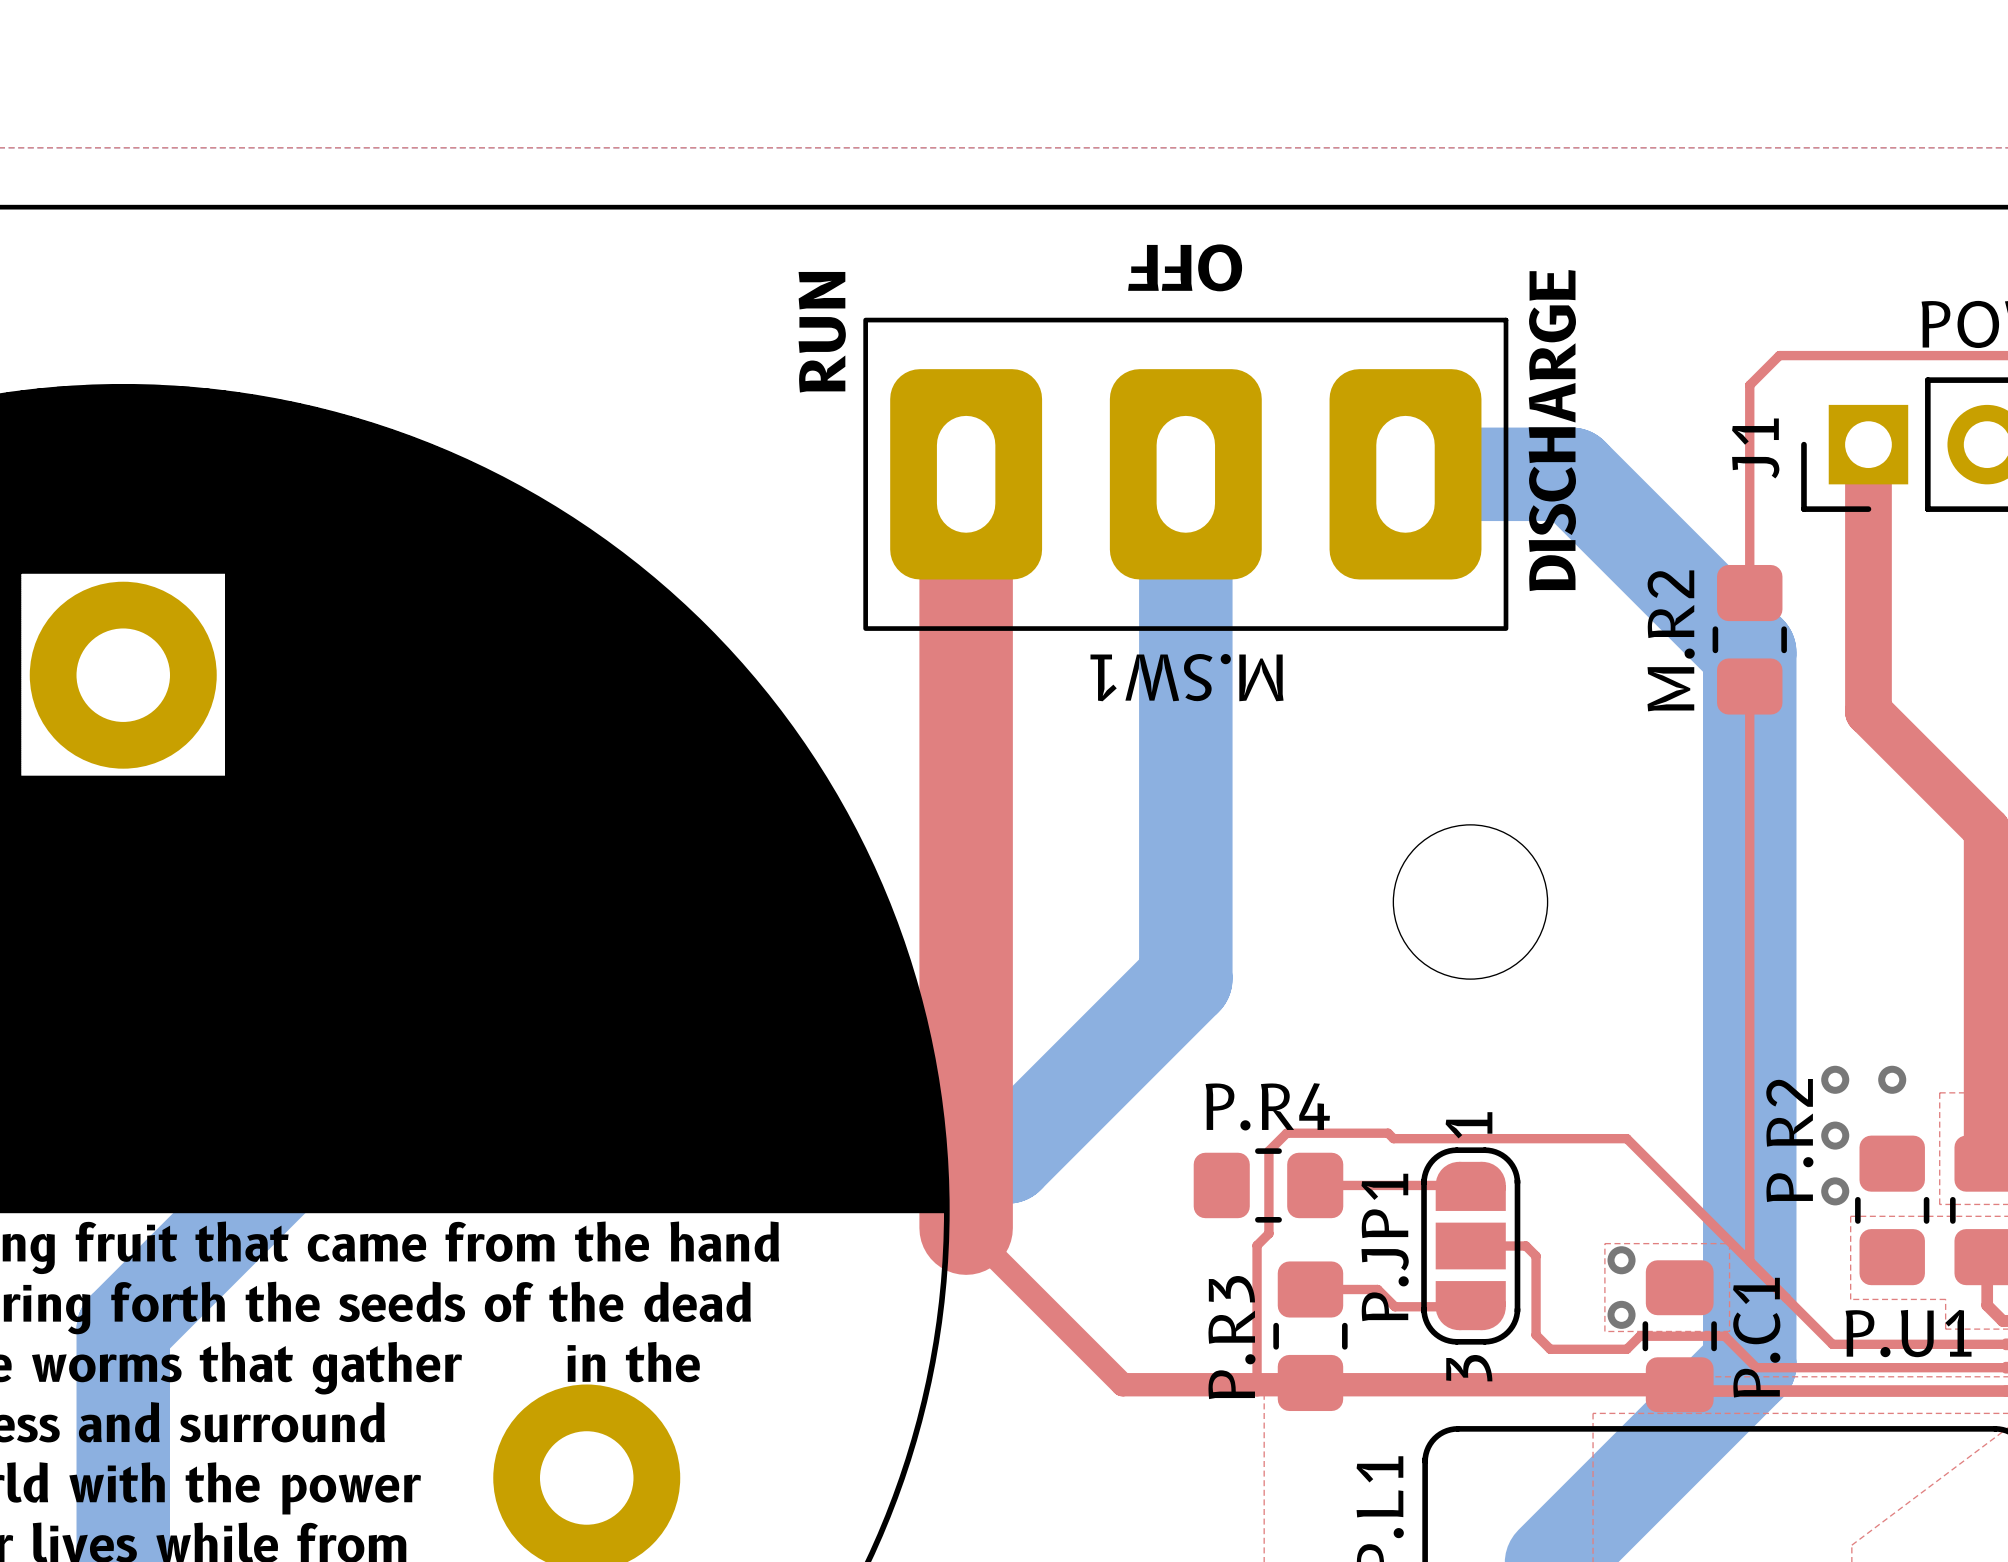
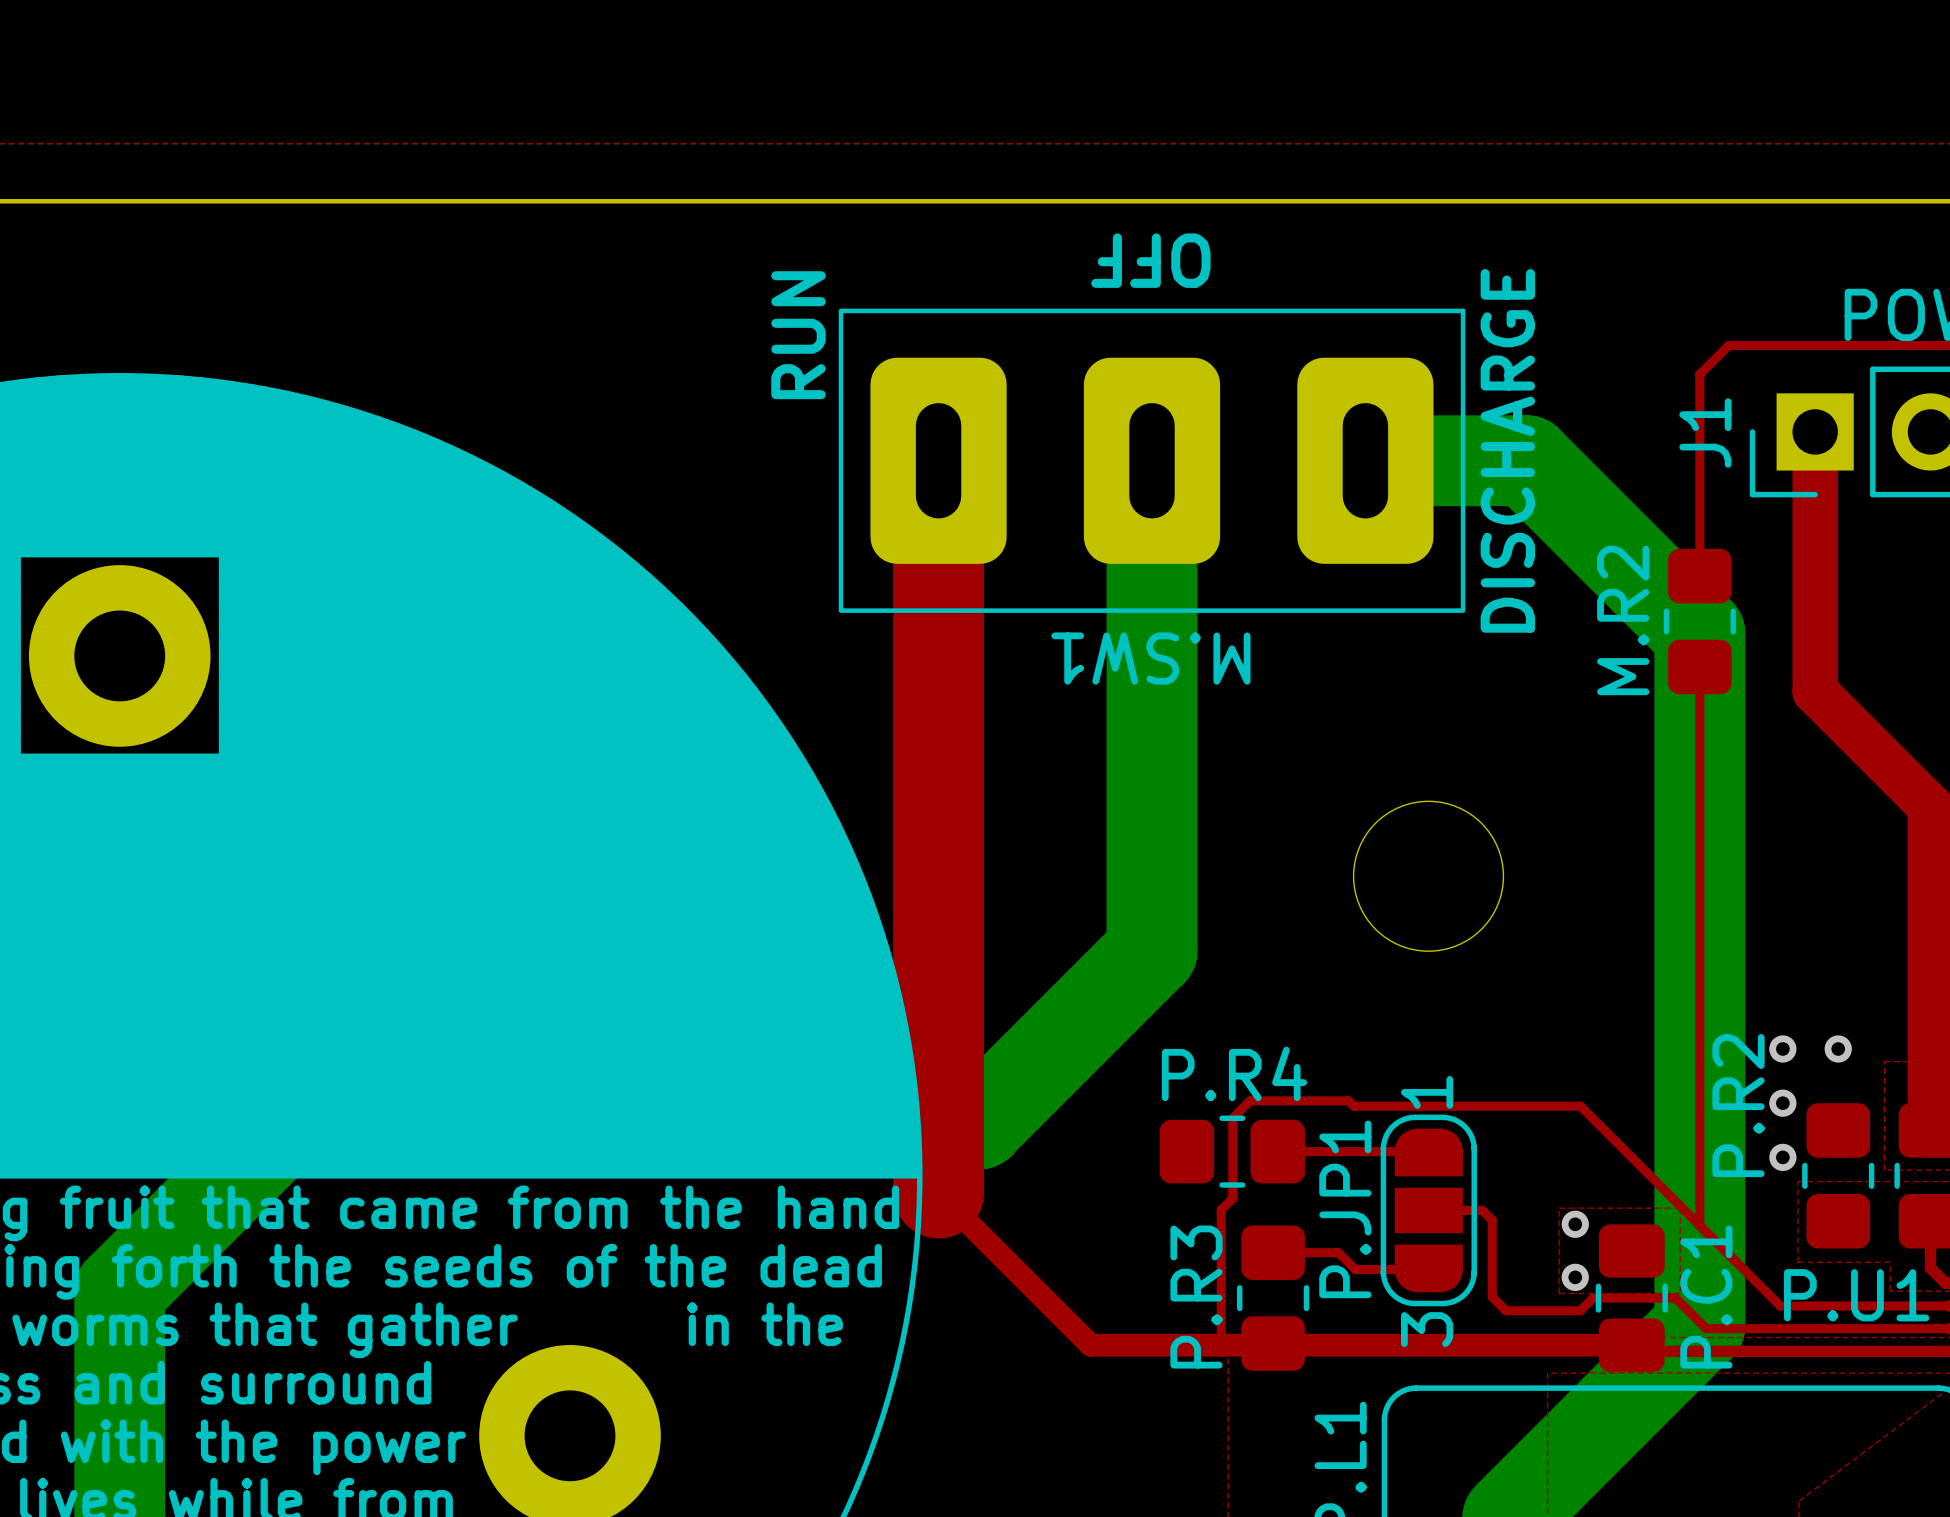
M.SW1 footprint: [863, 317, 1509, 631] -> [838, 308, 1466, 613]

